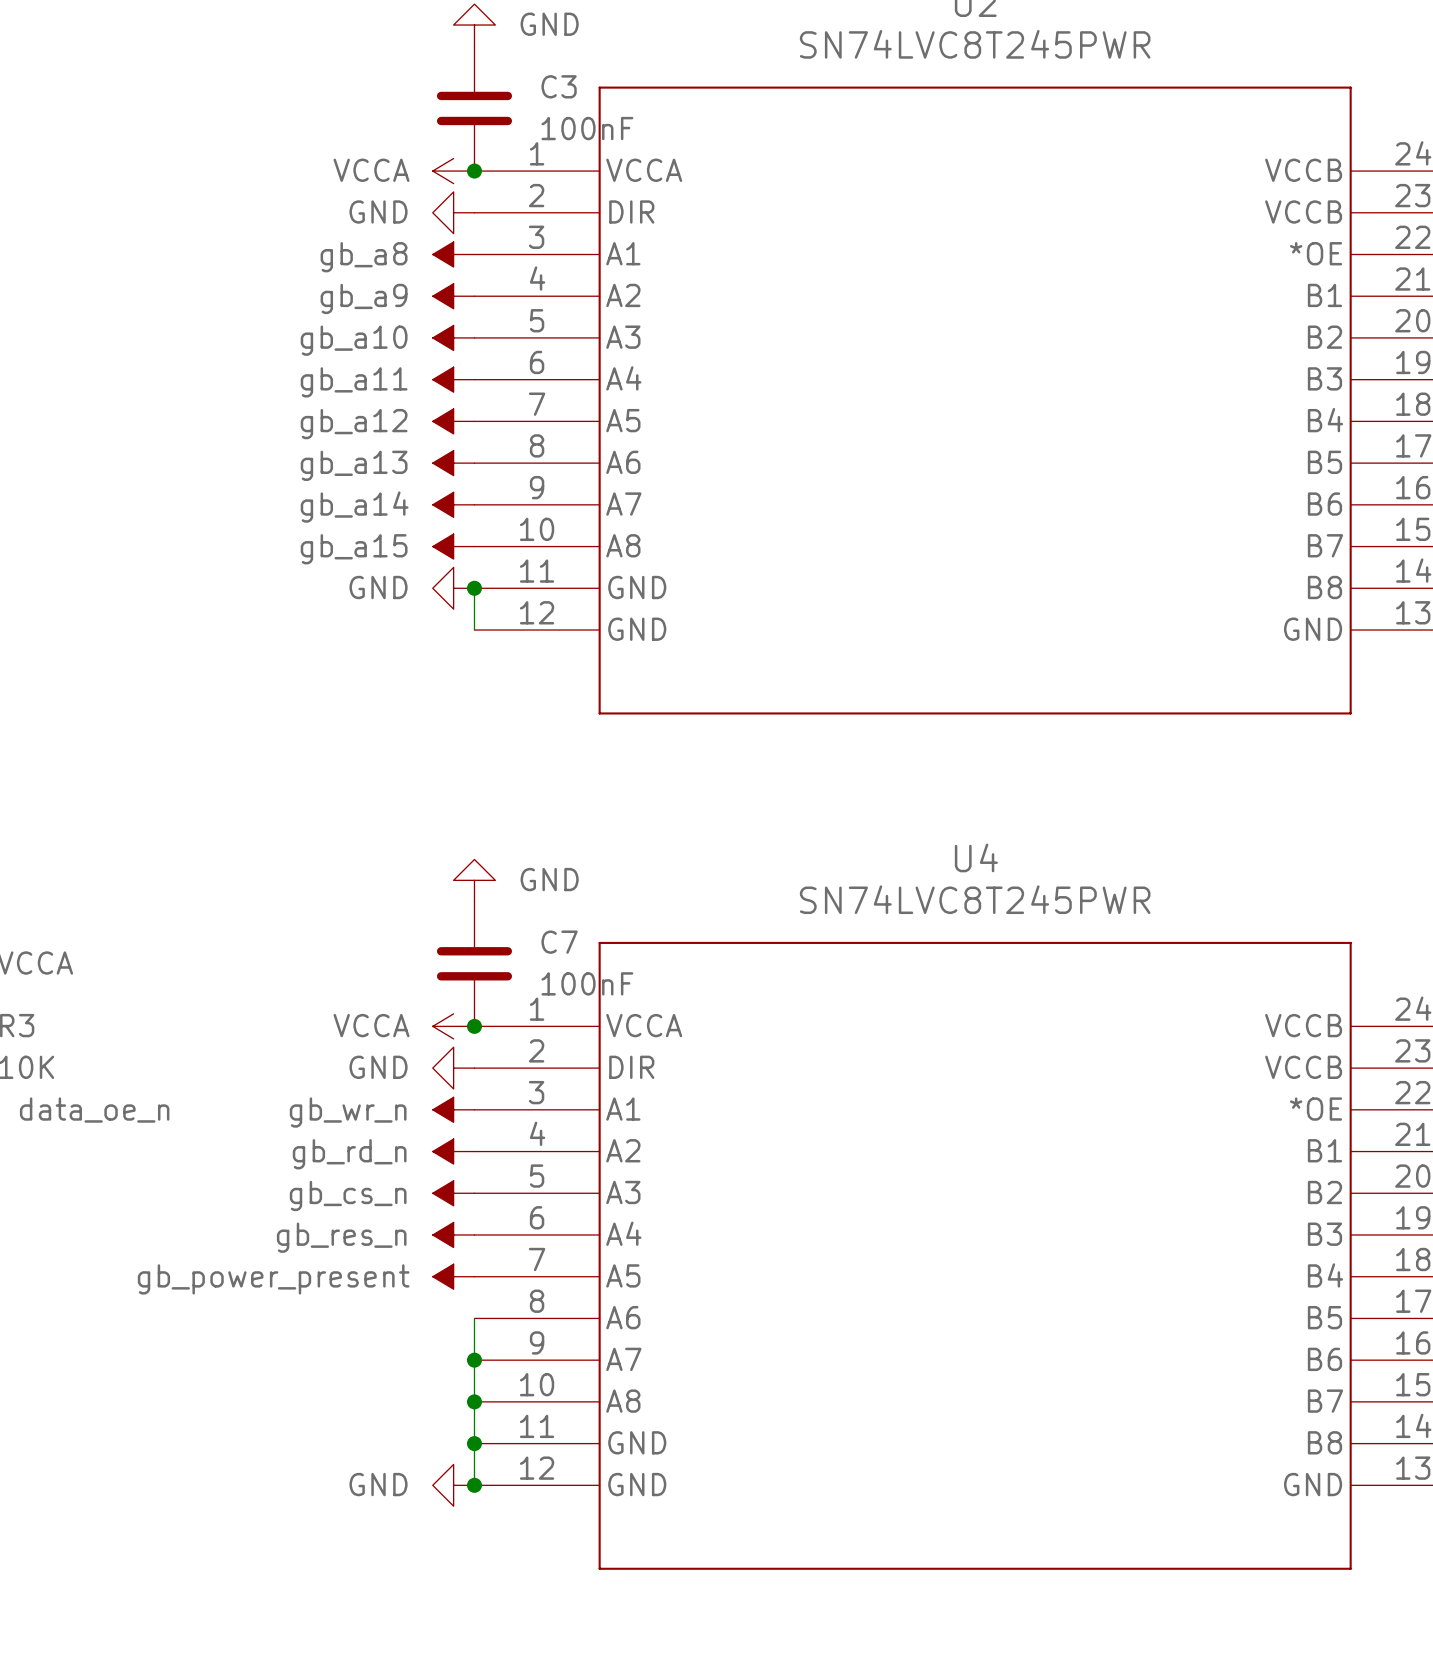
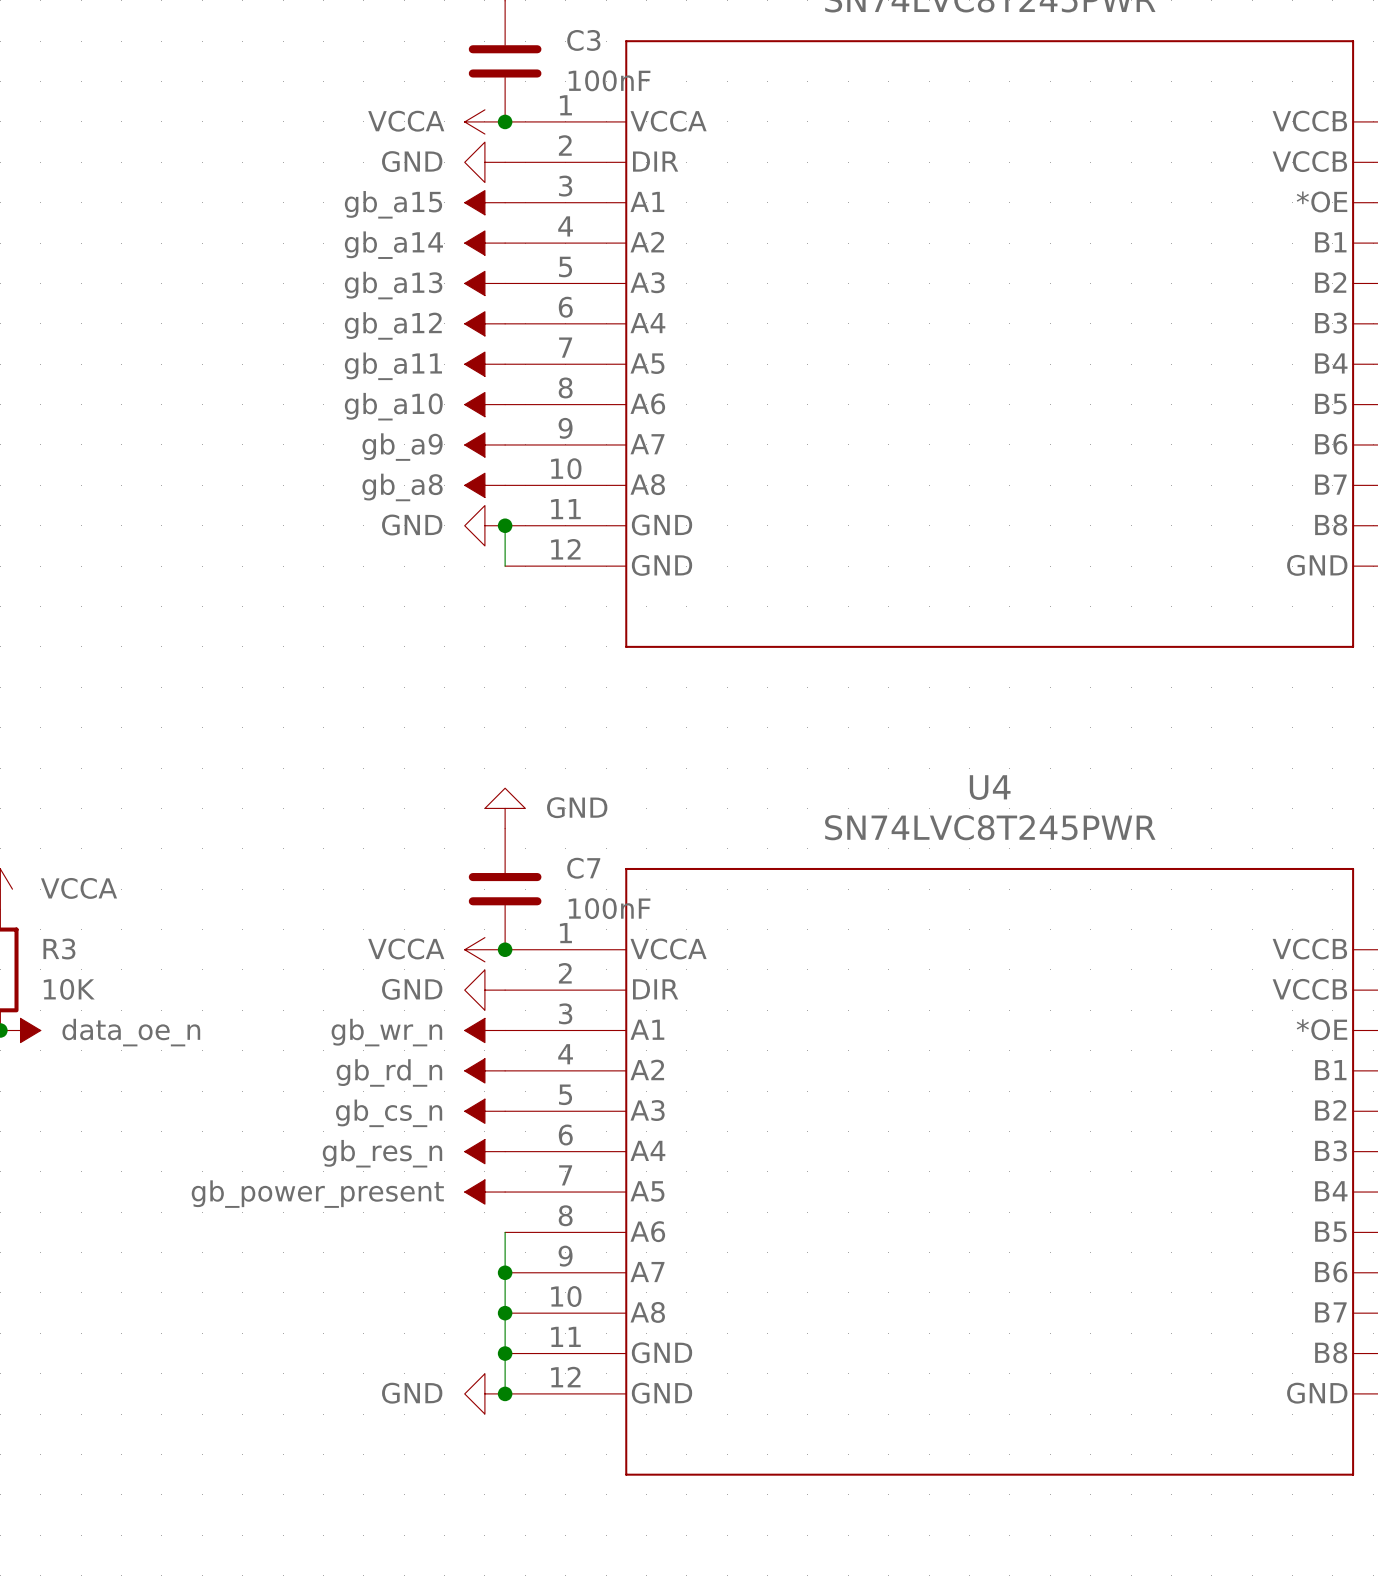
power symbol: gb_a8 (453, 254) -> gb_a15 (484, 202)
power symbol: gb_a9 (453, 296) -> gb_a14 (484, 243)
power symbol: gb_a10 (453, 337) -> gb_a13 (484, 283)
power symbol: gb_a11 (453, 379) -> gb_a12 (484, 323)
power symbol: gb_a12 (453, 421) -> gb_a11 (484, 364)
power symbol: gb_a13 (453, 463) -> gb_a10 (484, 404)
power symbol: gb_a14 (453, 504) -> gb_a9 (484, 444)
power symbol: gb_a15 (453, 546) -> gb_a8 (484, 485)

